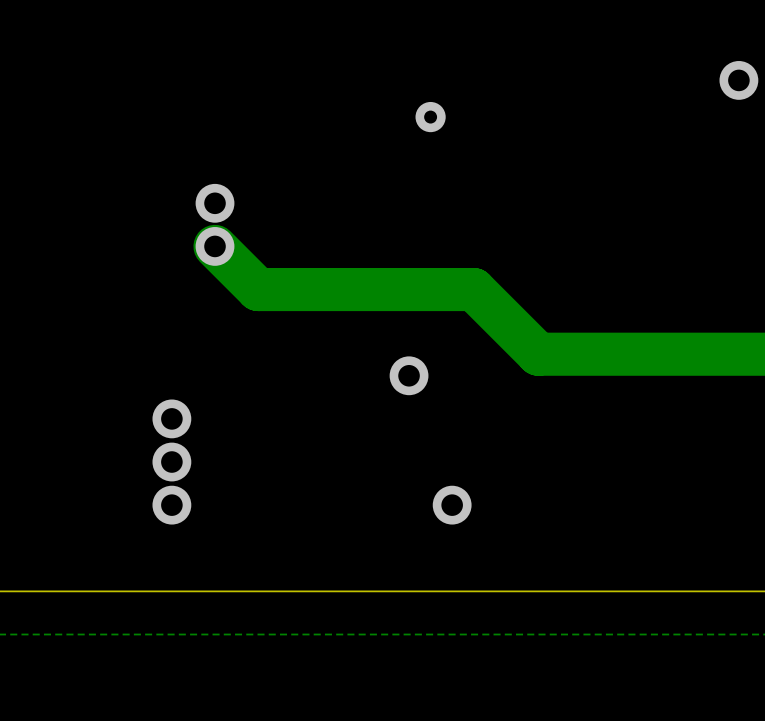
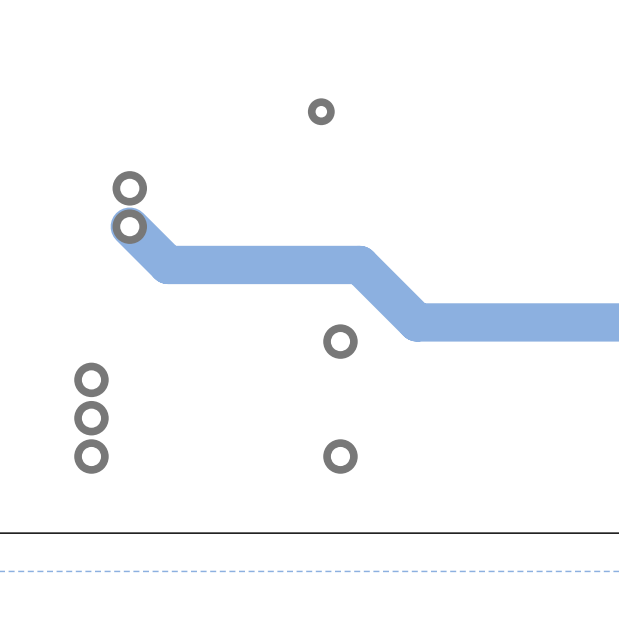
via: (738, 80) -> none
via position: (409, 375) -> (340, 341)

